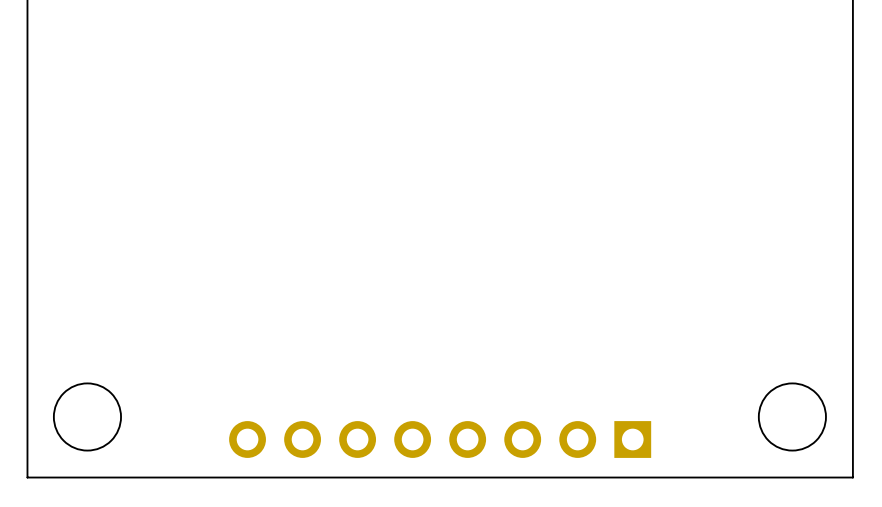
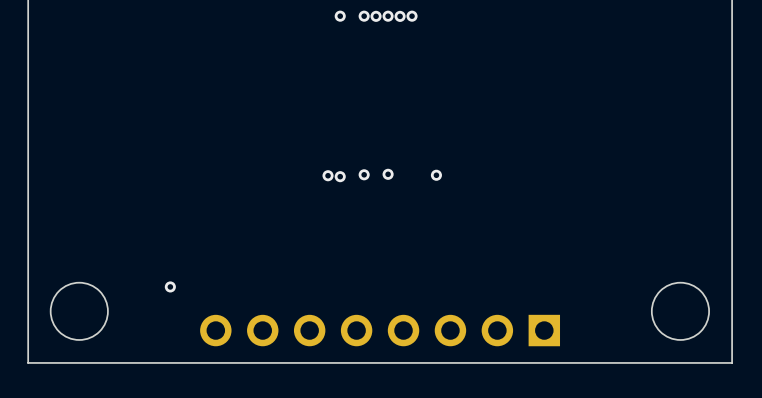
via: none -> (340, 16)
via: none -> (364, 16)
via: none -> (388, 16)
via: none -> (412, 16)
via: none -> (376, 16)
via: none -> (400, 16)
via: none -> (364, 174)
via: none -> (388, 174)
via: none -> (328, 175)
via: none -> (436, 175)
via: none -> (340, 176)
via: none -> (170, 286)

